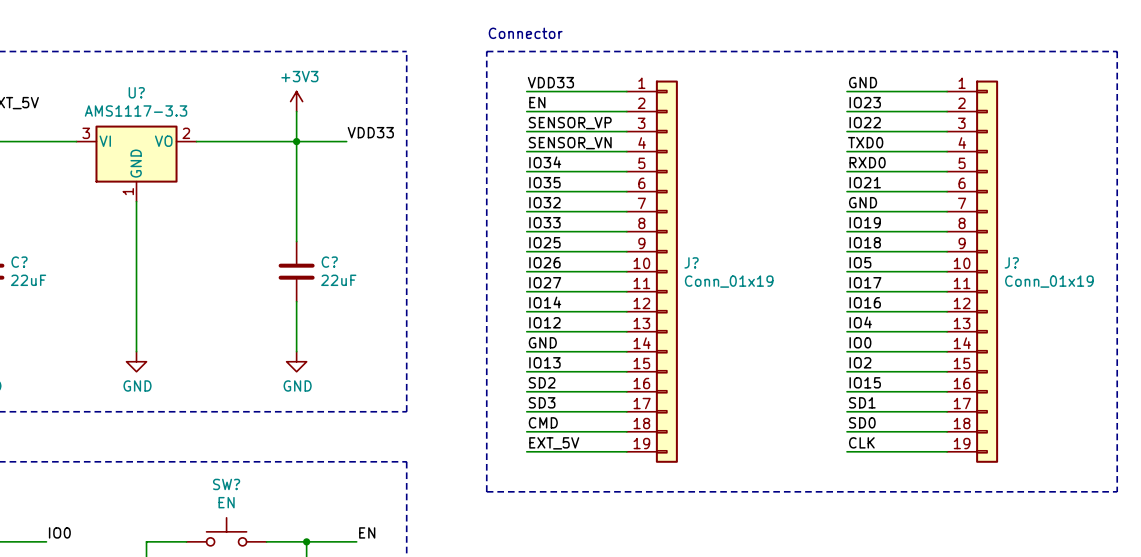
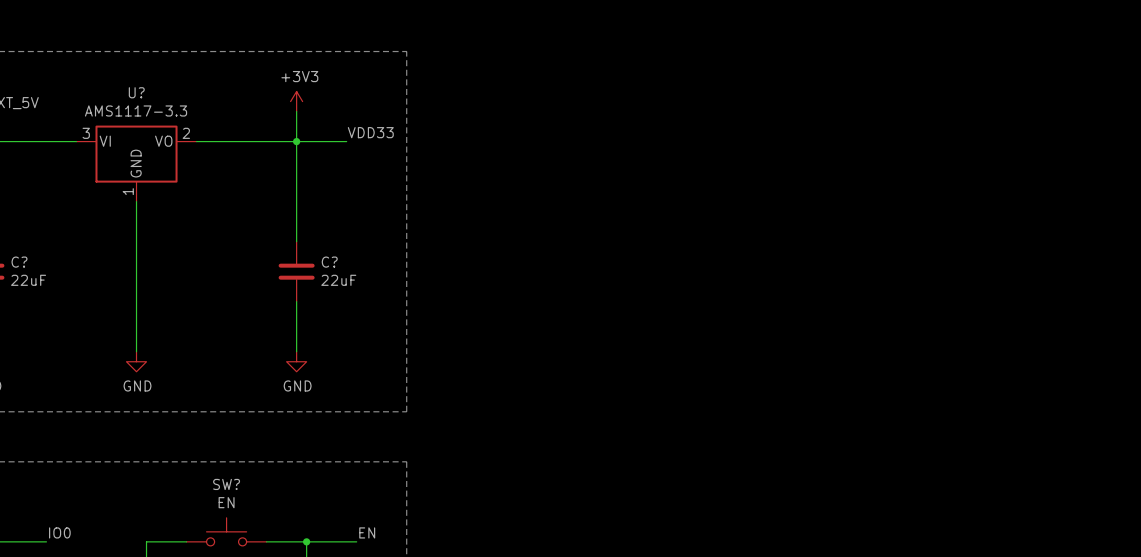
text: Connector (525, 33) -> none
line: (486, 51) (486, 491) (1117, 491) (1117, 51) (486, 51) -> none
label: VDD33 (550, 82) -> none
label: GND (863, 82) -> none
wire: (526, 91) (626, 91) -> none
wire: (847, 91) (947, 91) -> none
label: EN (537, 102) -> none
label: IO23 (865, 102) -> none
wire: (526, 111) (626, 111) -> none
wire: (847, 111) (947, 111) -> none
label: IO22 (865, 122) -> none
label: SENSOR_VP (570, 123) -> none
wire: (526, 131) (626, 131) -> none
wire: (847, 131) (947, 131) -> none
label: TXD0 (865, 142) -> none
label: SENSOR_VN (570, 143) -> none
wire: (526, 151) (626, 151) -> none
wire: (847, 151) (947, 151) -> none
label: IO34 (545, 162) -> none
label: RXD0 (867, 162) -> none
wire: (526, 171) (626, 171) -> none
wire: (847, 171) (947, 171) -> none
label: IO35 (544, 182) -> none
label: IO21 (865, 182) -> none
wire: (526, 191) (626, 191) -> none
wire: (847, 191) (947, 191) -> none
label: IO32 (544, 202) -> none
label: GND (863, 202) -> none
wire: (526, 211) (626, 211) -> none
wire: (847, 211) (947, 211) -> none
label: IO33 (544, 222) -> none
label: IO19 (865, 222) -> none
wire: (526, 231) (626, 231) -> none
wire: (847, 231) (947, 231) -> none
label: IO25 (544, 242) -> none
label: IO18 (865, 242) -> none
wire: (526, 251) (626, 251) -> none
wire: (847, 251) (947, 251) -> none
label: IO26 (544, 262) -> none
label: IO5 (860, 262) -> none
wire: (526, 271) (626, 271) -> none
J?: Conn_01x19 (652, 271) -> none
wire: (847, 271) (947, 271) -> none
J?: Conn_01x19 (972, 271) -> none
label: IO27 (545, 282) -> none
label: IO17 (865, 282) -> none
wire: (526, 291) (626, 291) -> none
wire: (847, 291) (947, 291) -> none
label: IO14 (545, 302) -> none
label: IO16 (865, 302) -> none
wire: (526, 311) (626, 311) -> none
wire: (847, 311) (947, 311) -> none
label: IO12 (544, 322) -> none
label: IO4 (860, 322) -> none
wire: (526, 331) (626, 331) -> none
wire: (847, 331) (947, 331) -> none
label: GND (542, 342) -> none
label: IO0 (860, 342) -> none
wire: (526, 351) (626, 351) -> none
wire: (847, 351) (947, 351) -> none
label: IO13 (544, 362) -> none
label: IO2 (860, 362) -> none
wire: (526, 371) (626, 371) -> none
wire: (847, 371) (947, 371) -> none
label: SD2 (542, 382) -> none
label: IO15 (865, 382) -> none
wire: (526, 391) (626, 391) -> none
wire: (847, 391) (947, 391) -> none
label: SD3 (542, 402) -> none
label: SD1 (862, 402) -> none
wire: (526, 411) (626, 411) -> none
wire: (847, 411) (947, 411) -> none
label: CMD (543, 422) -> none
label: SD0 (862, 422) -> none
wire: (526, 431) (626, 431) -> none
wire: (847, 431) (947, 431) -> none
label: CLK (861, 442) -> none
label: EXT_5V (554, 443) -> none
wire: (526, 451) (626, 451) -> none
wire: (847, 451) (947, 451) -> none

